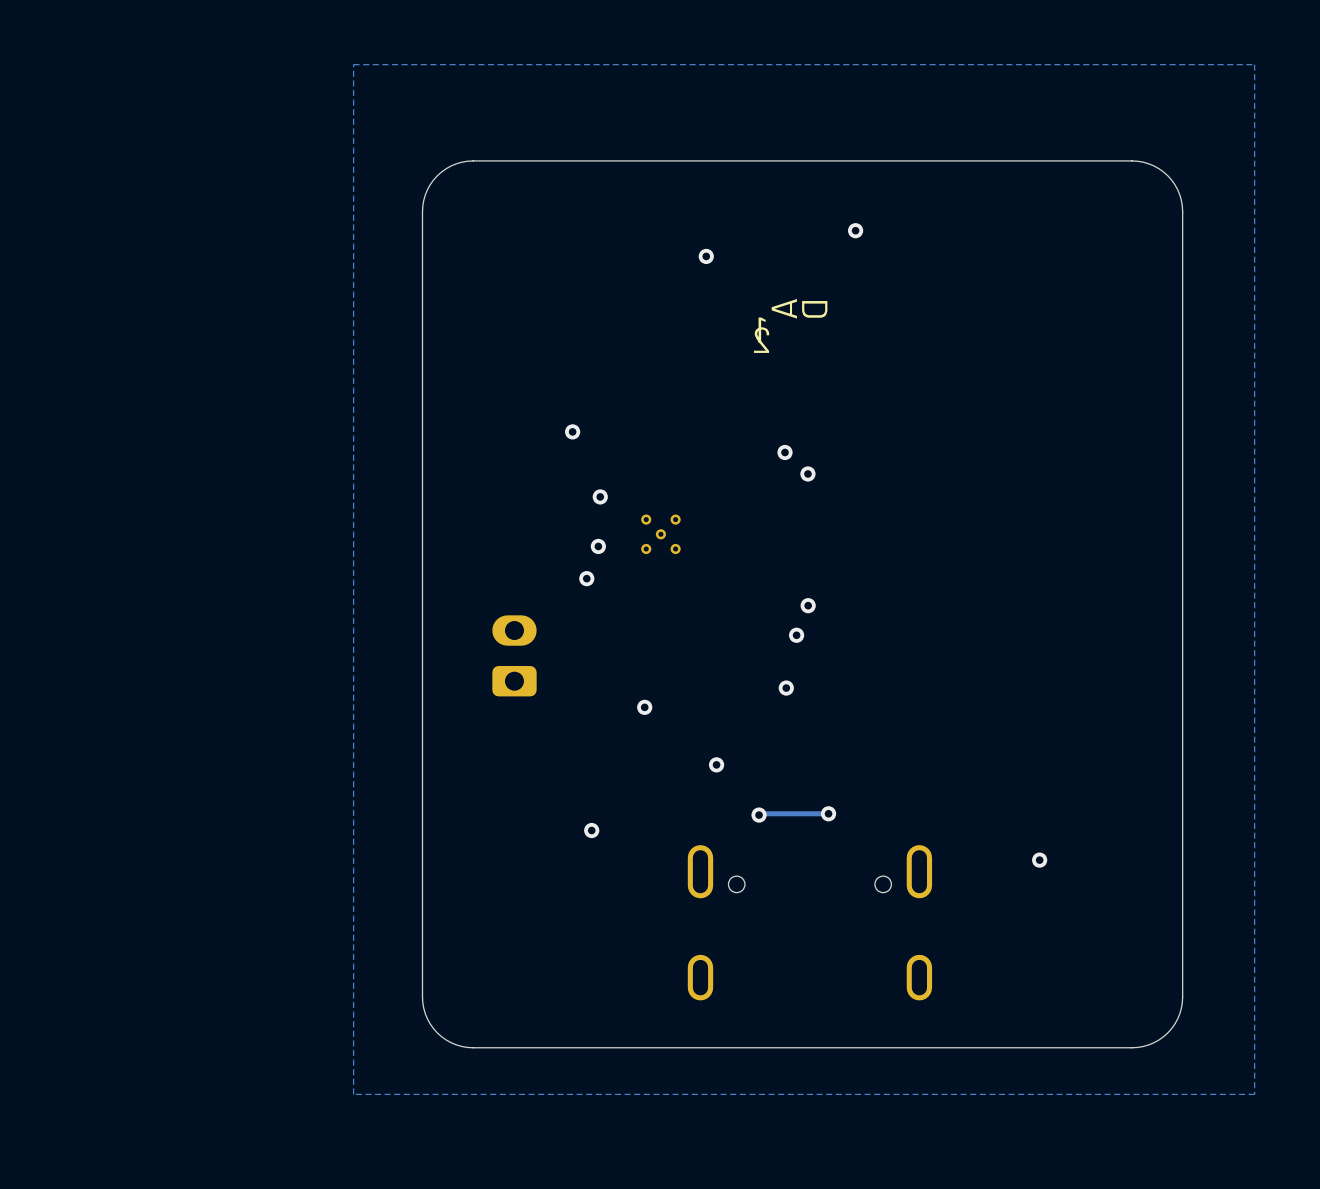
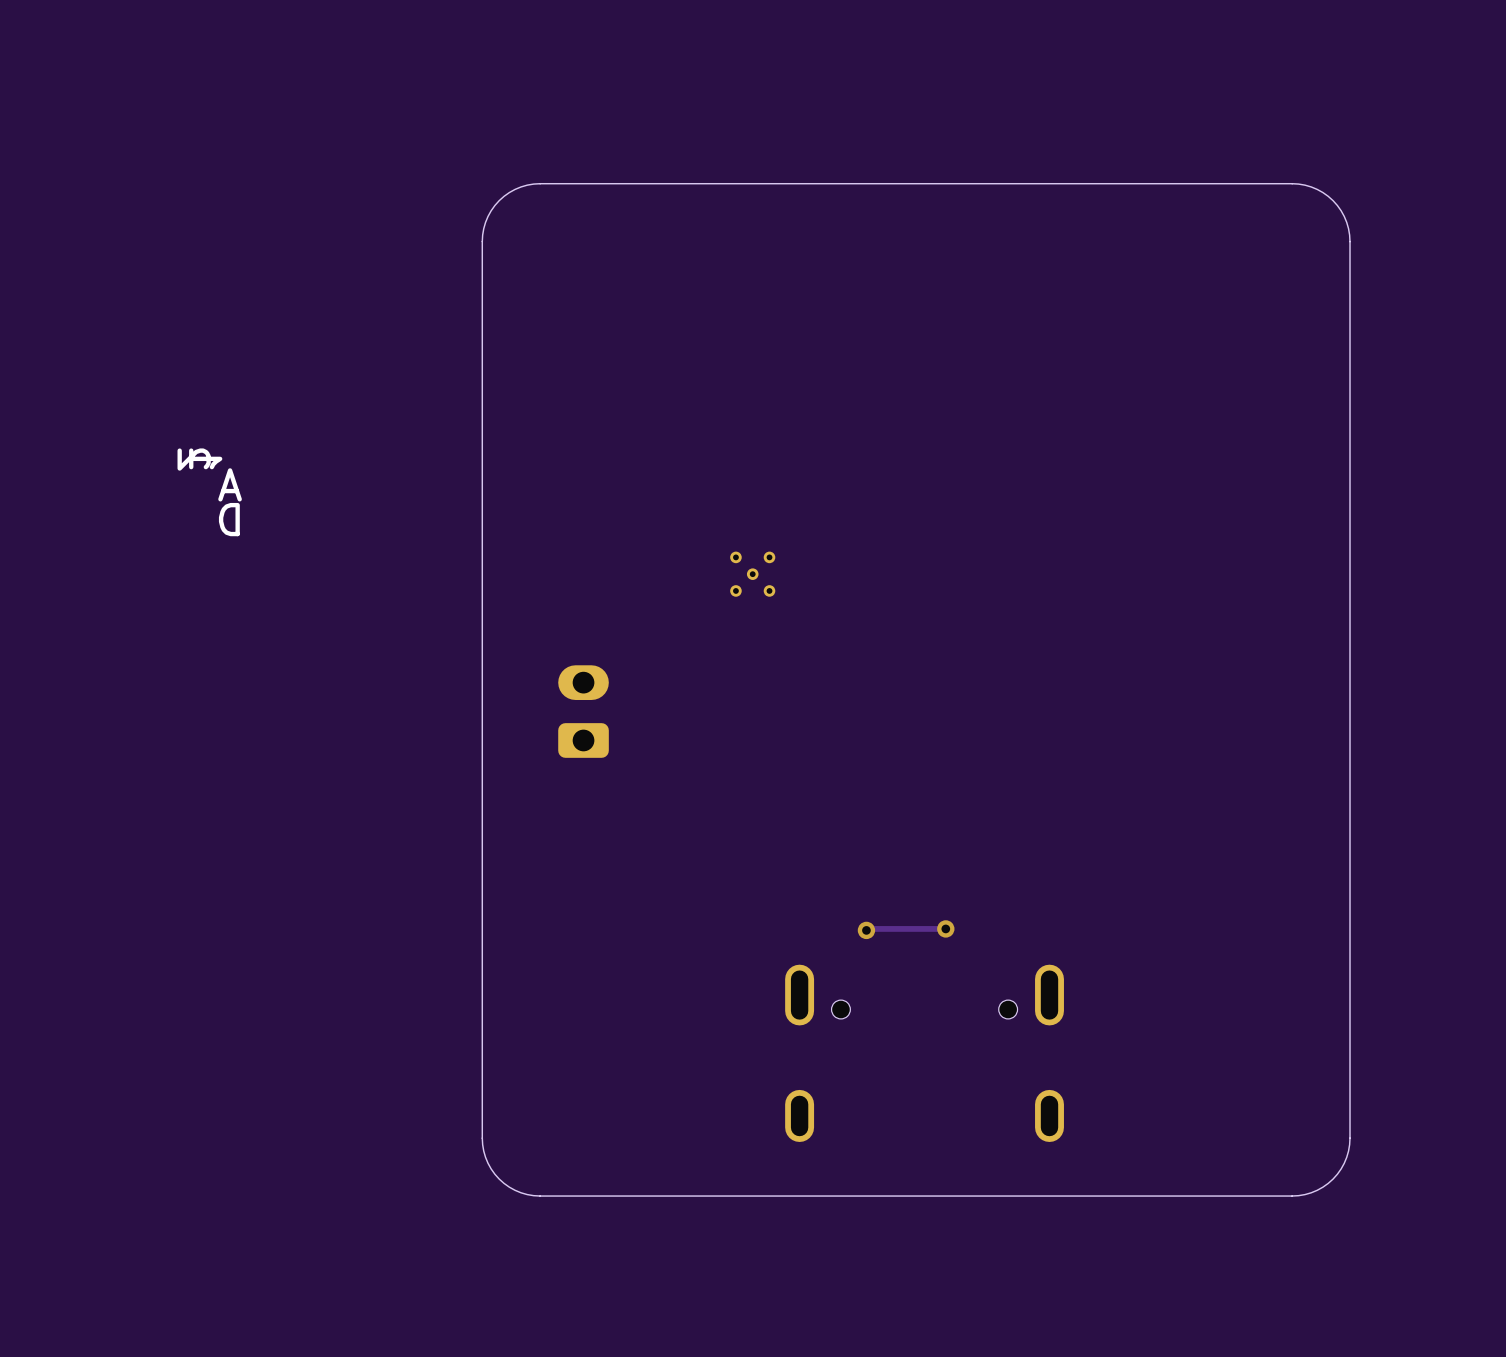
zone outline: (1254, 64) (1254, 1094) (353, 1094) (353, 64) (1254, 64) -> none
via: (855, 230) -> none
via: (706, 256) -> none
part rotation: 0° (790, 325) -> 90° clockwise (209, 492)
part position: (790, 325) -> (209, 492)
via: (572, 431) -> none
via: (785, 452) -> none
via: (807, 473) -> none
via: (600, 496) -> none
part position: (660, 534) -> (752, 574)
via: (598, 546) -> none
via: (586, 578) -> none
via: (808, 605) -> none
via: (796, 635) -> none
part position: (514, 655) -> (583, 711)
via: (786, 688) -> none
via: (644, 707) -> none
via: (716, 764) -> none
via: (591, 830) -> none
via: (1039, 860) -> none

